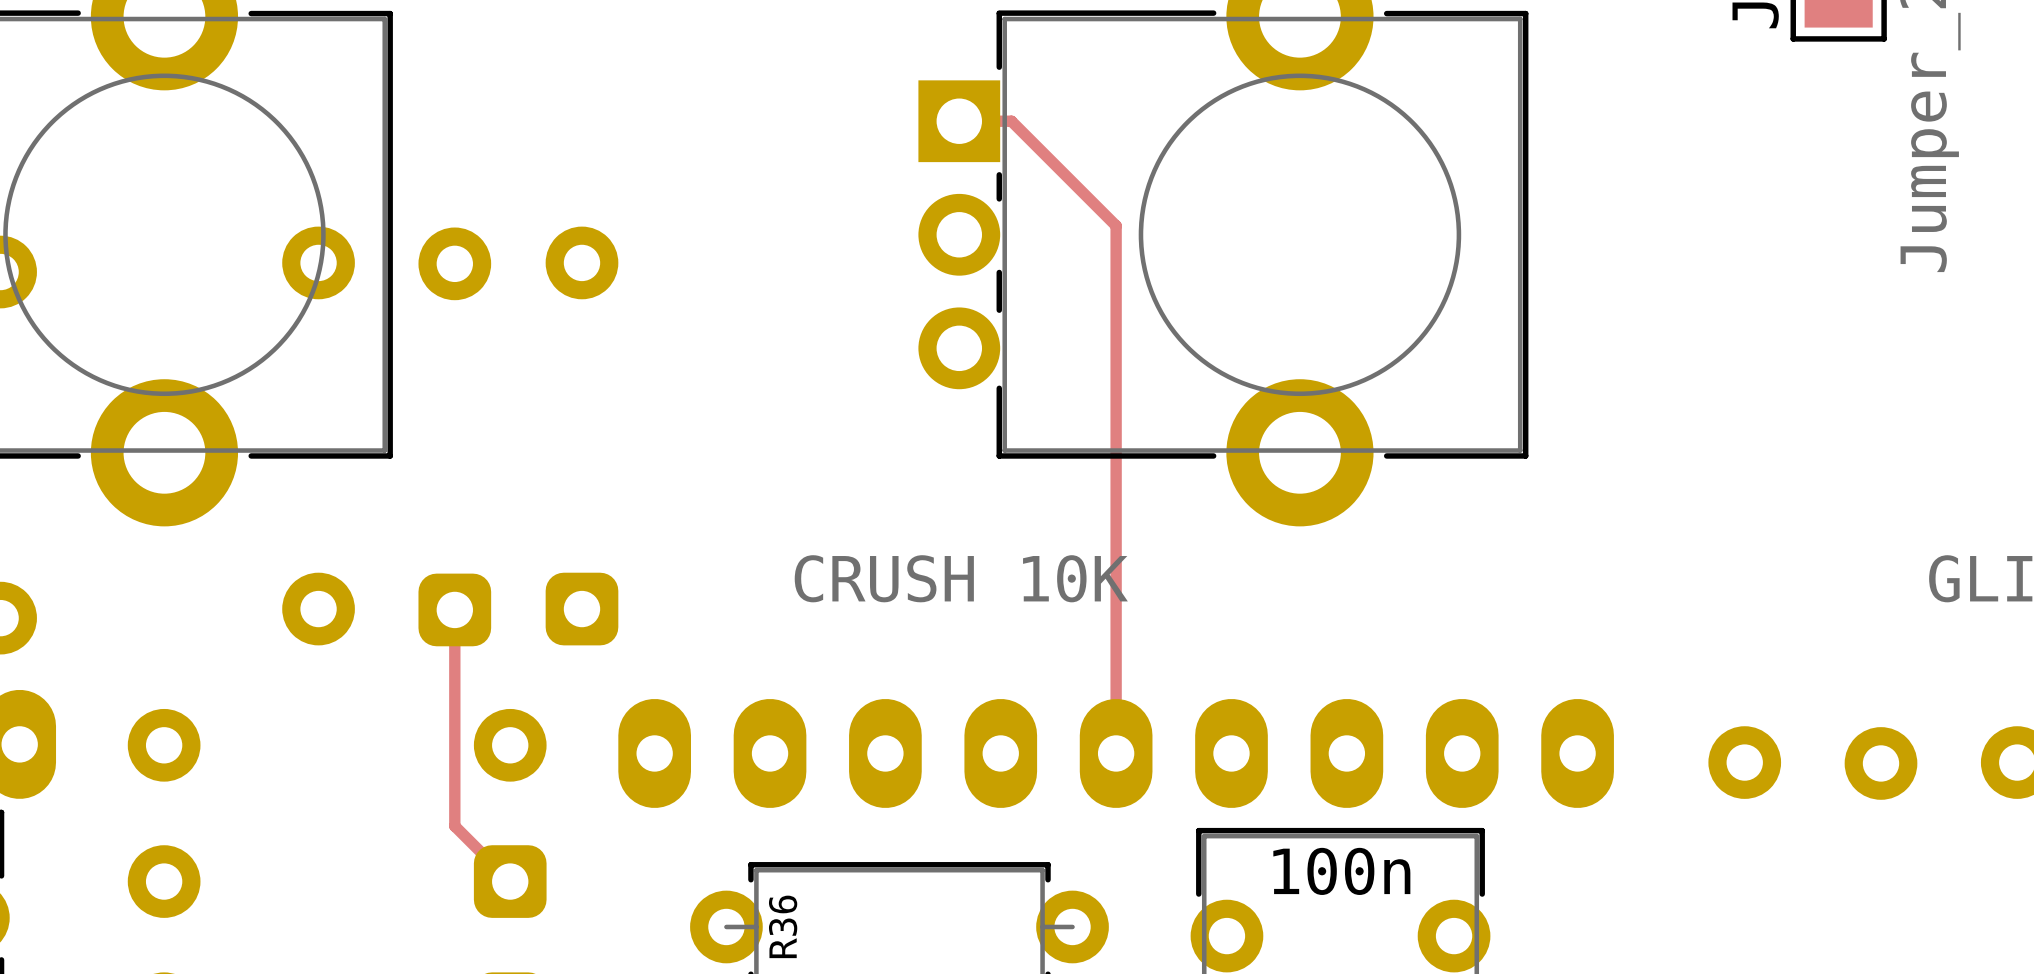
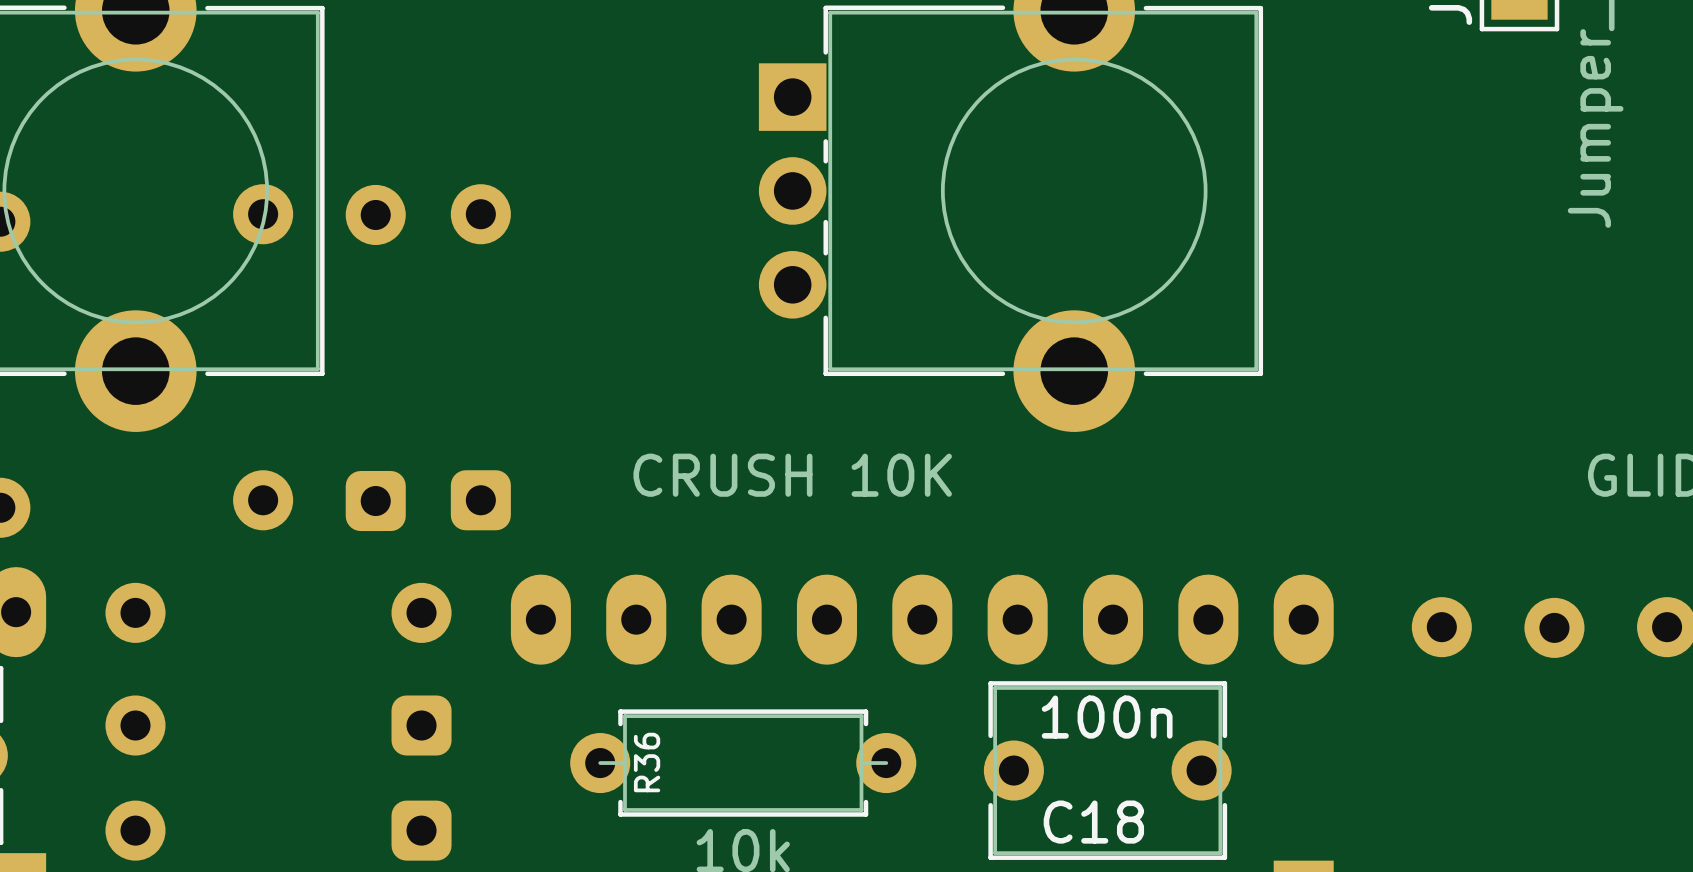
track: (959, 121) (1011, 121) (1116, 225) (1116, 753) -> none
track: (454, 609) (454, 826) (510, 881) -> none

